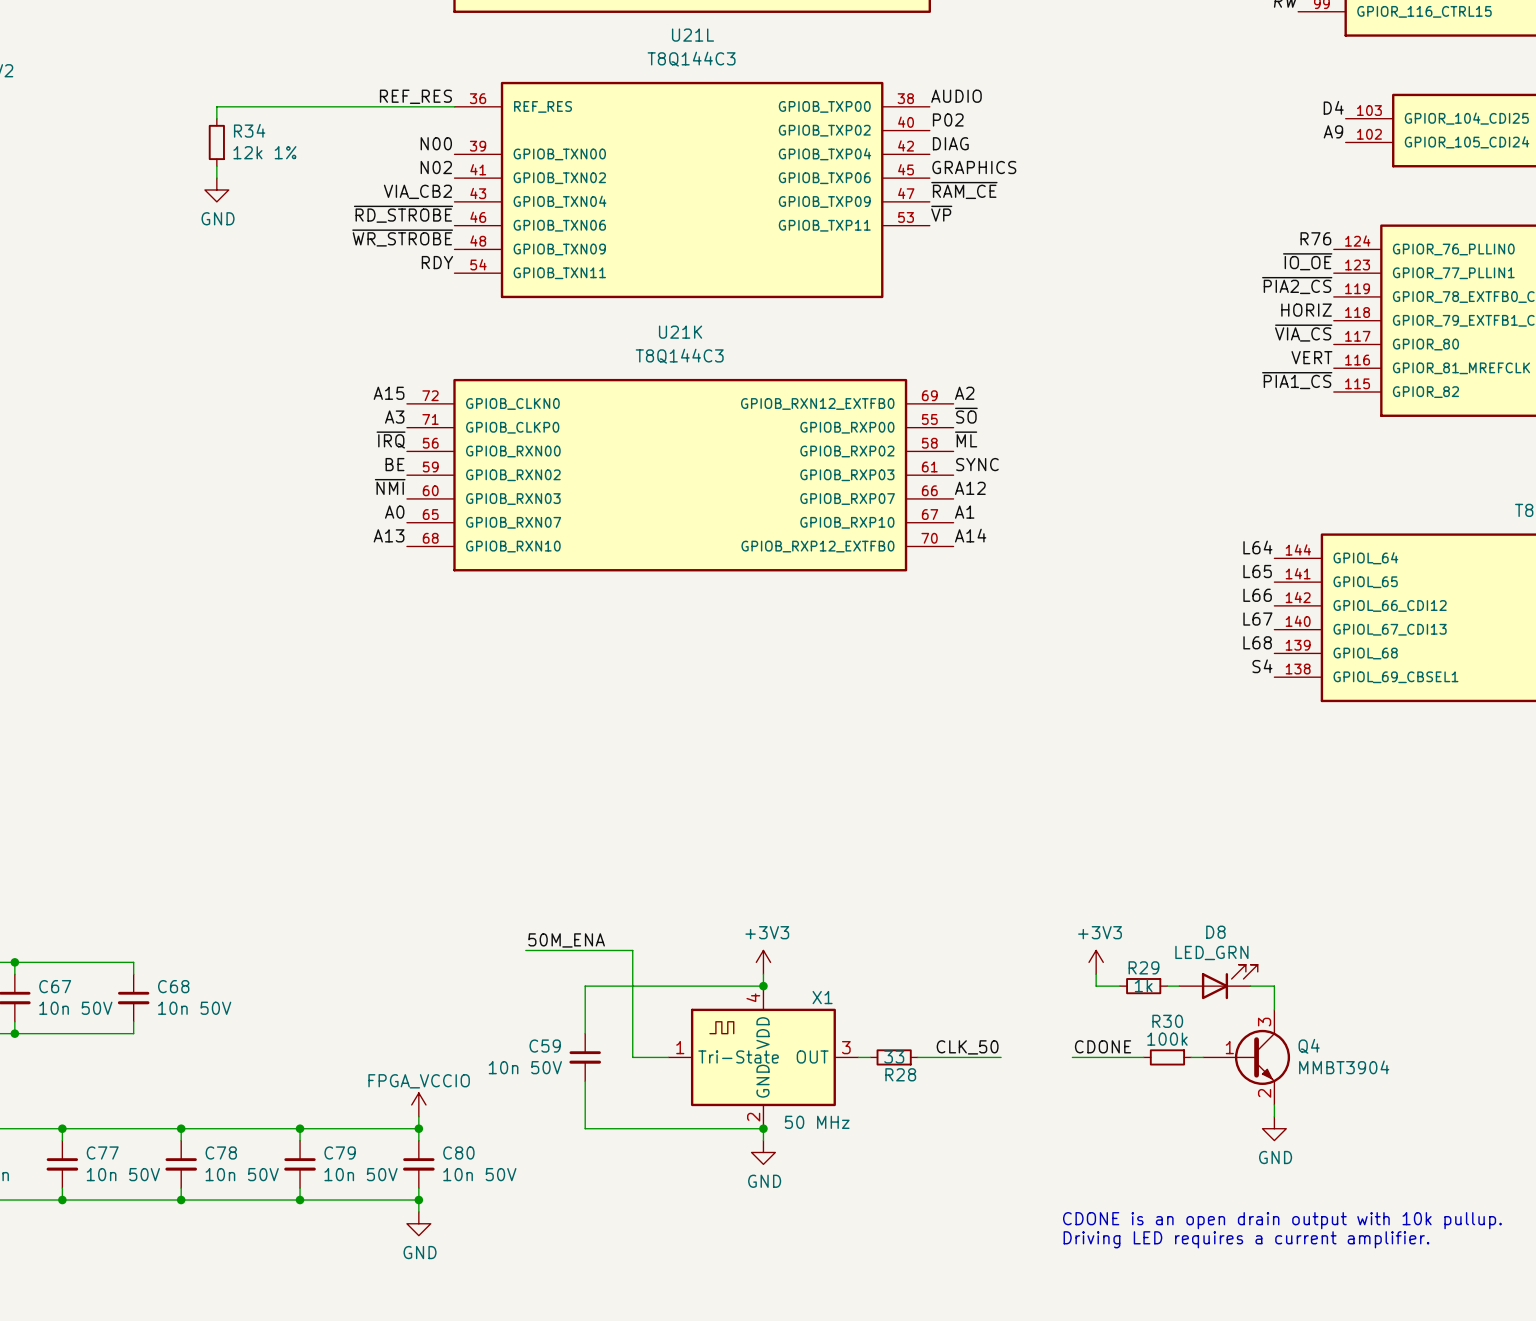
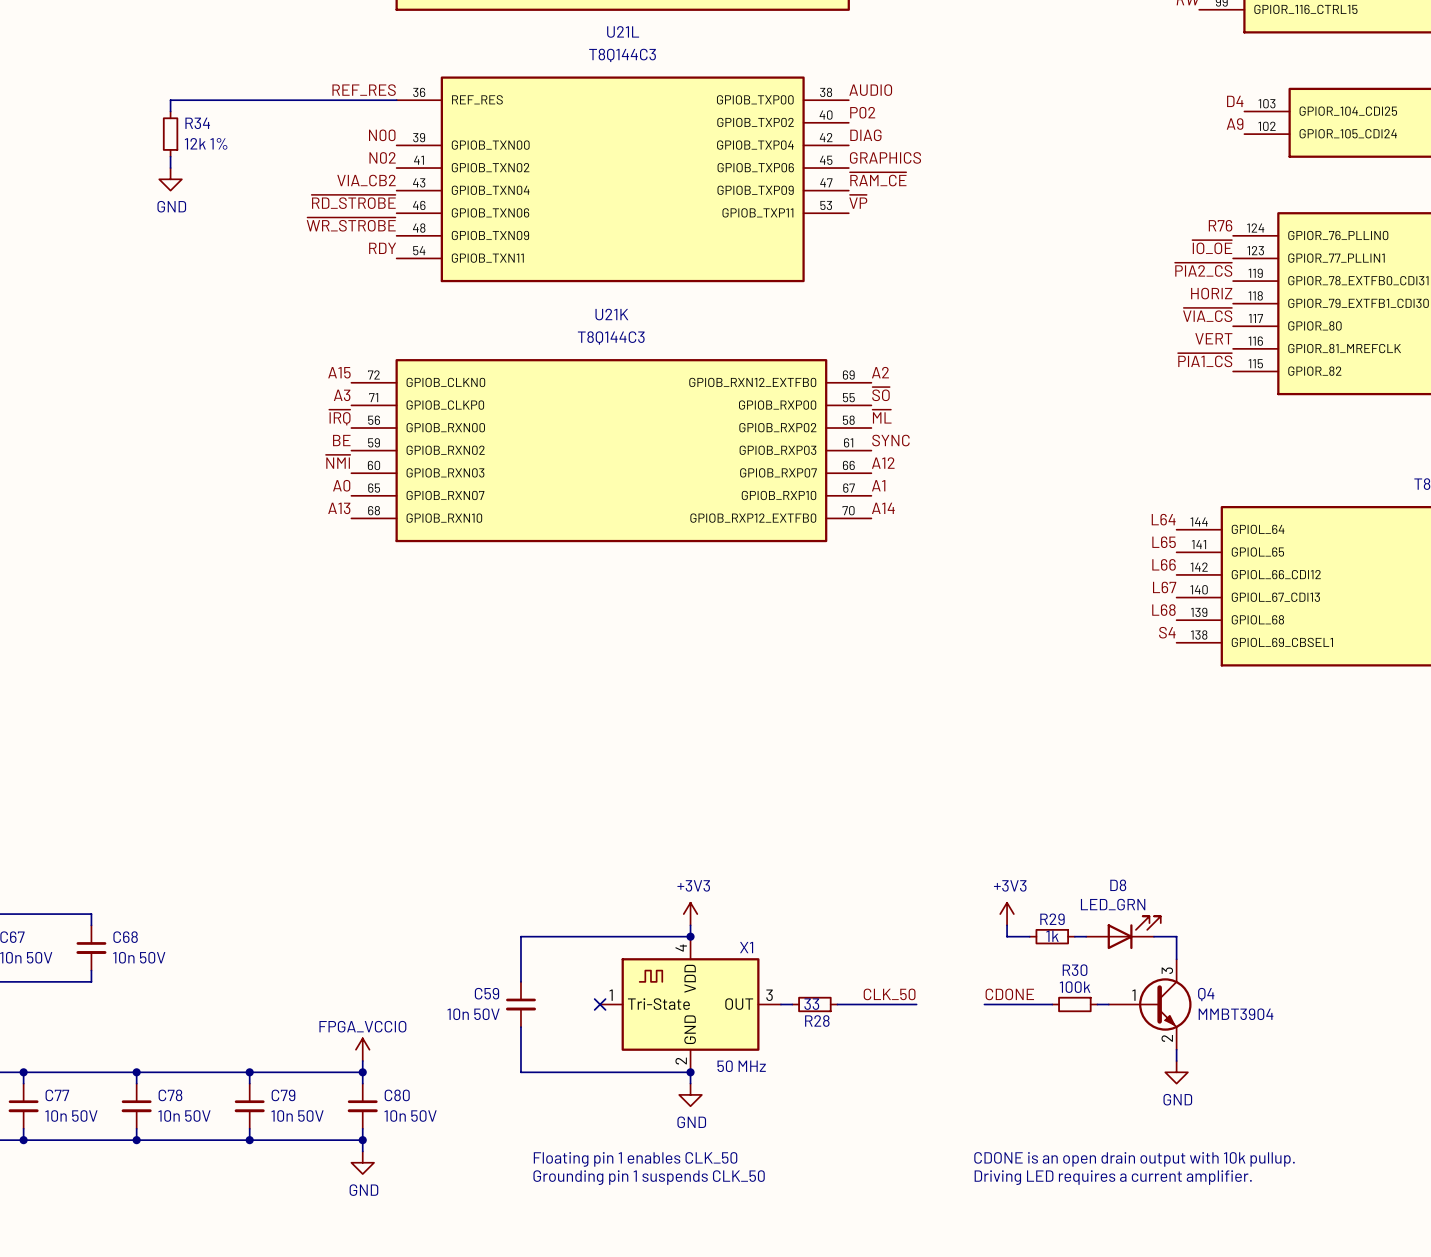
label: 50M_ENA (566, 940) -> none
wire: (525, 950) (632, 950) (632, 1057) (668, 1057) -> none
no-connect mark: none -> (600, 1004)
text: none -> Floating pin 1 enables CLK_50 (635, 1159)
text: none -> Grounding pin 1 suspends CLK_50 (649, 1177)

